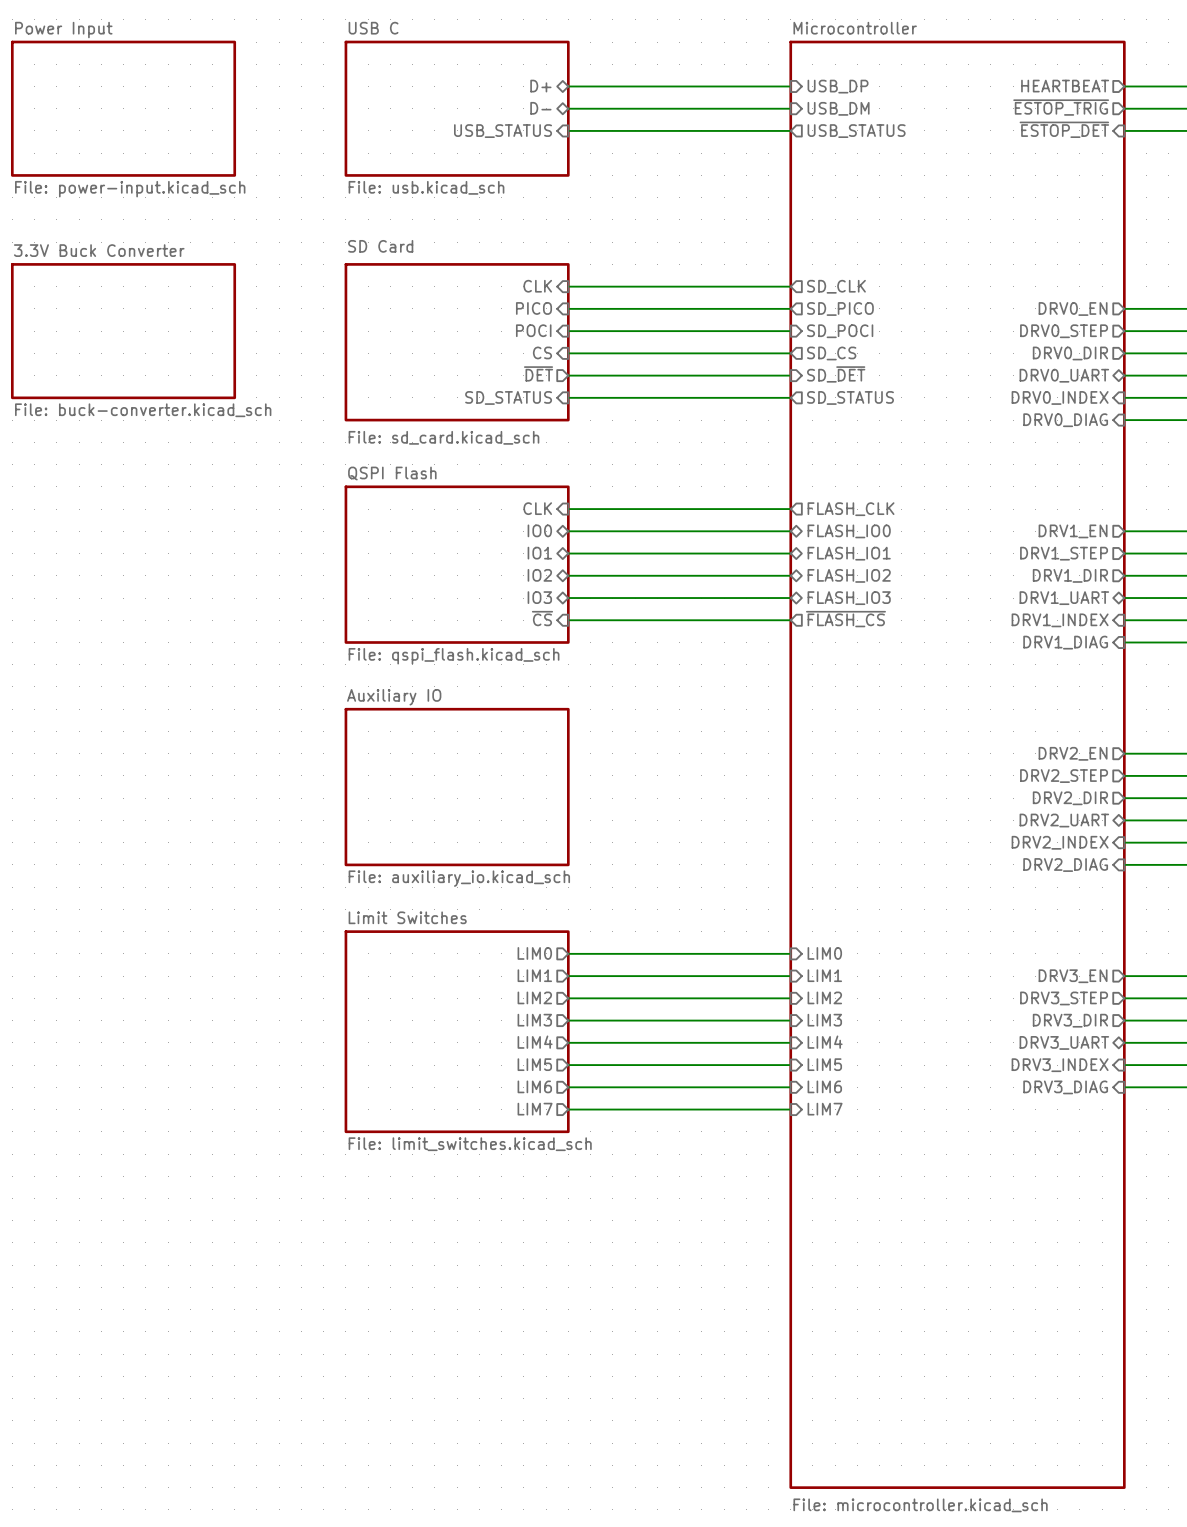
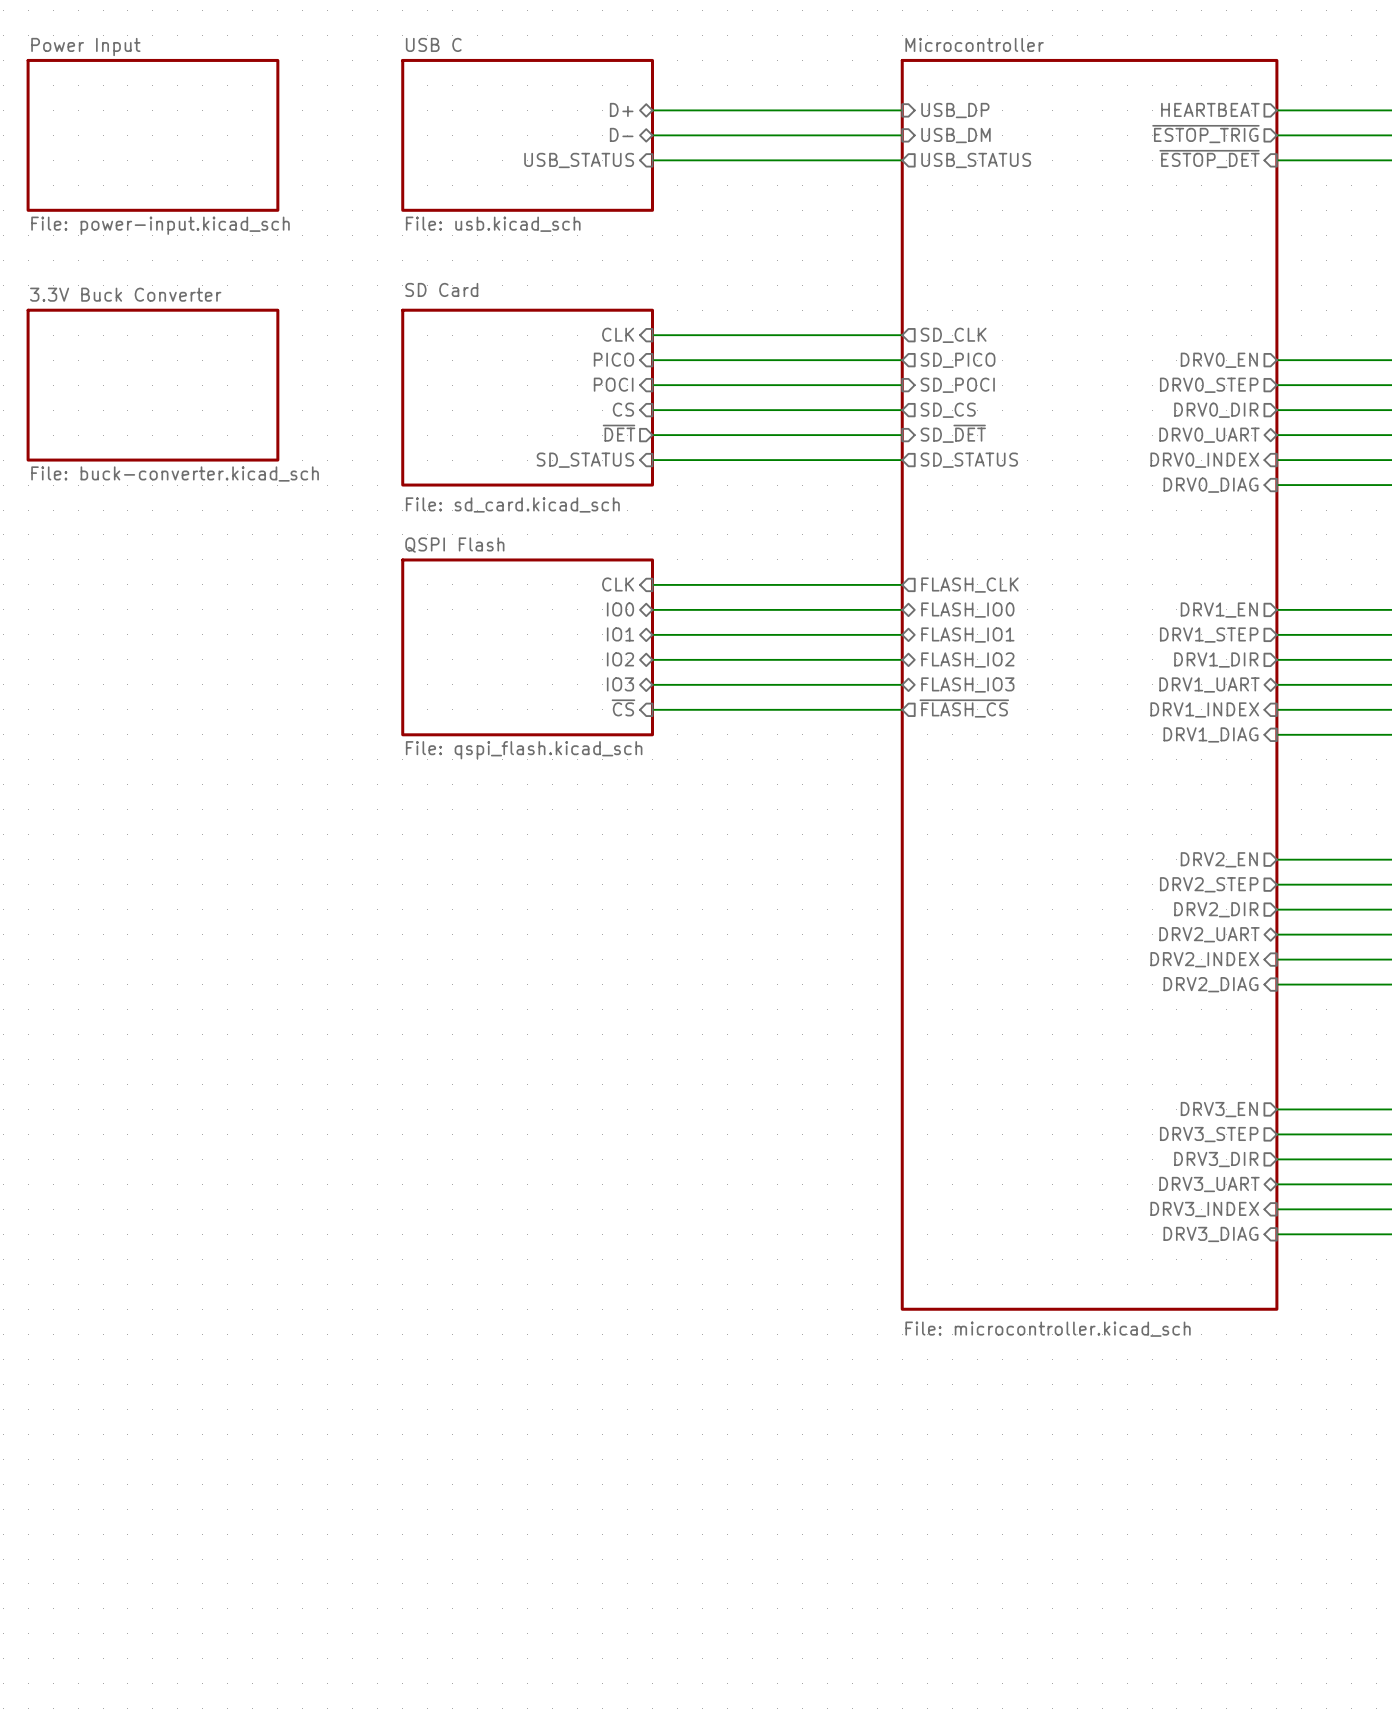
sheet Microcontroller: none -> File: microcontroller.kicad_sch (1089, 684)
sheet Microcontroller: File: microcontroller.kicad_sch (957, 764) -> none
sheet Auxiliary IO: File: auxiliary_io.kicad_sch (457, 787) -> none
sheet pin: LIM0 (534, 953) -> none
wire: (568, 953) (790, 953) -> none
sheet pin: LIM0 (824, 953) -> none
sheet pin: LIM1 (534, 975) -> none
sheet pin: LIM1 (824, 975) -> none
wire: (568, 976) (790, 976) -> none
sheet pin: LIM2 (534, 997) -> none
sheet pin: LIM2 (824, 997) -> none
wire: (568, 998) (790, 998) -> none
sheet pin: LIM3 (534, 1020) -> none
wire: (568, 1020) (790, 1020) -> none
sheet pin: LIM3 (824, 1020) -> none
sheet Limit Switches: File: limit_switches.kicad_sch (457, 1031) -> none
sheet pin: LIM4 (535, 1042) -> none
wire: (568, 1042) (790, 1042) -> none
sheet pin: LIM4 (825, 1042) -> none
sheet pin: LIM5 (534, 1064) -> none
sheet pin: LIM5 (824, 1064) -> none
wire: (568, 1065) (790, 1065) -> none
sheet pin: LIM6 (534, 1086) -> none
sheet pin: LIM6 (824, 1086) -> none
wire: (568, 1087) (790, 1087) -> none
sheet pin: LIM7 (535, 1109) -> none
wire: (568, 1109) (790, 1109) -> none
sheet pin: LIM7 (825, 1109) -> none

